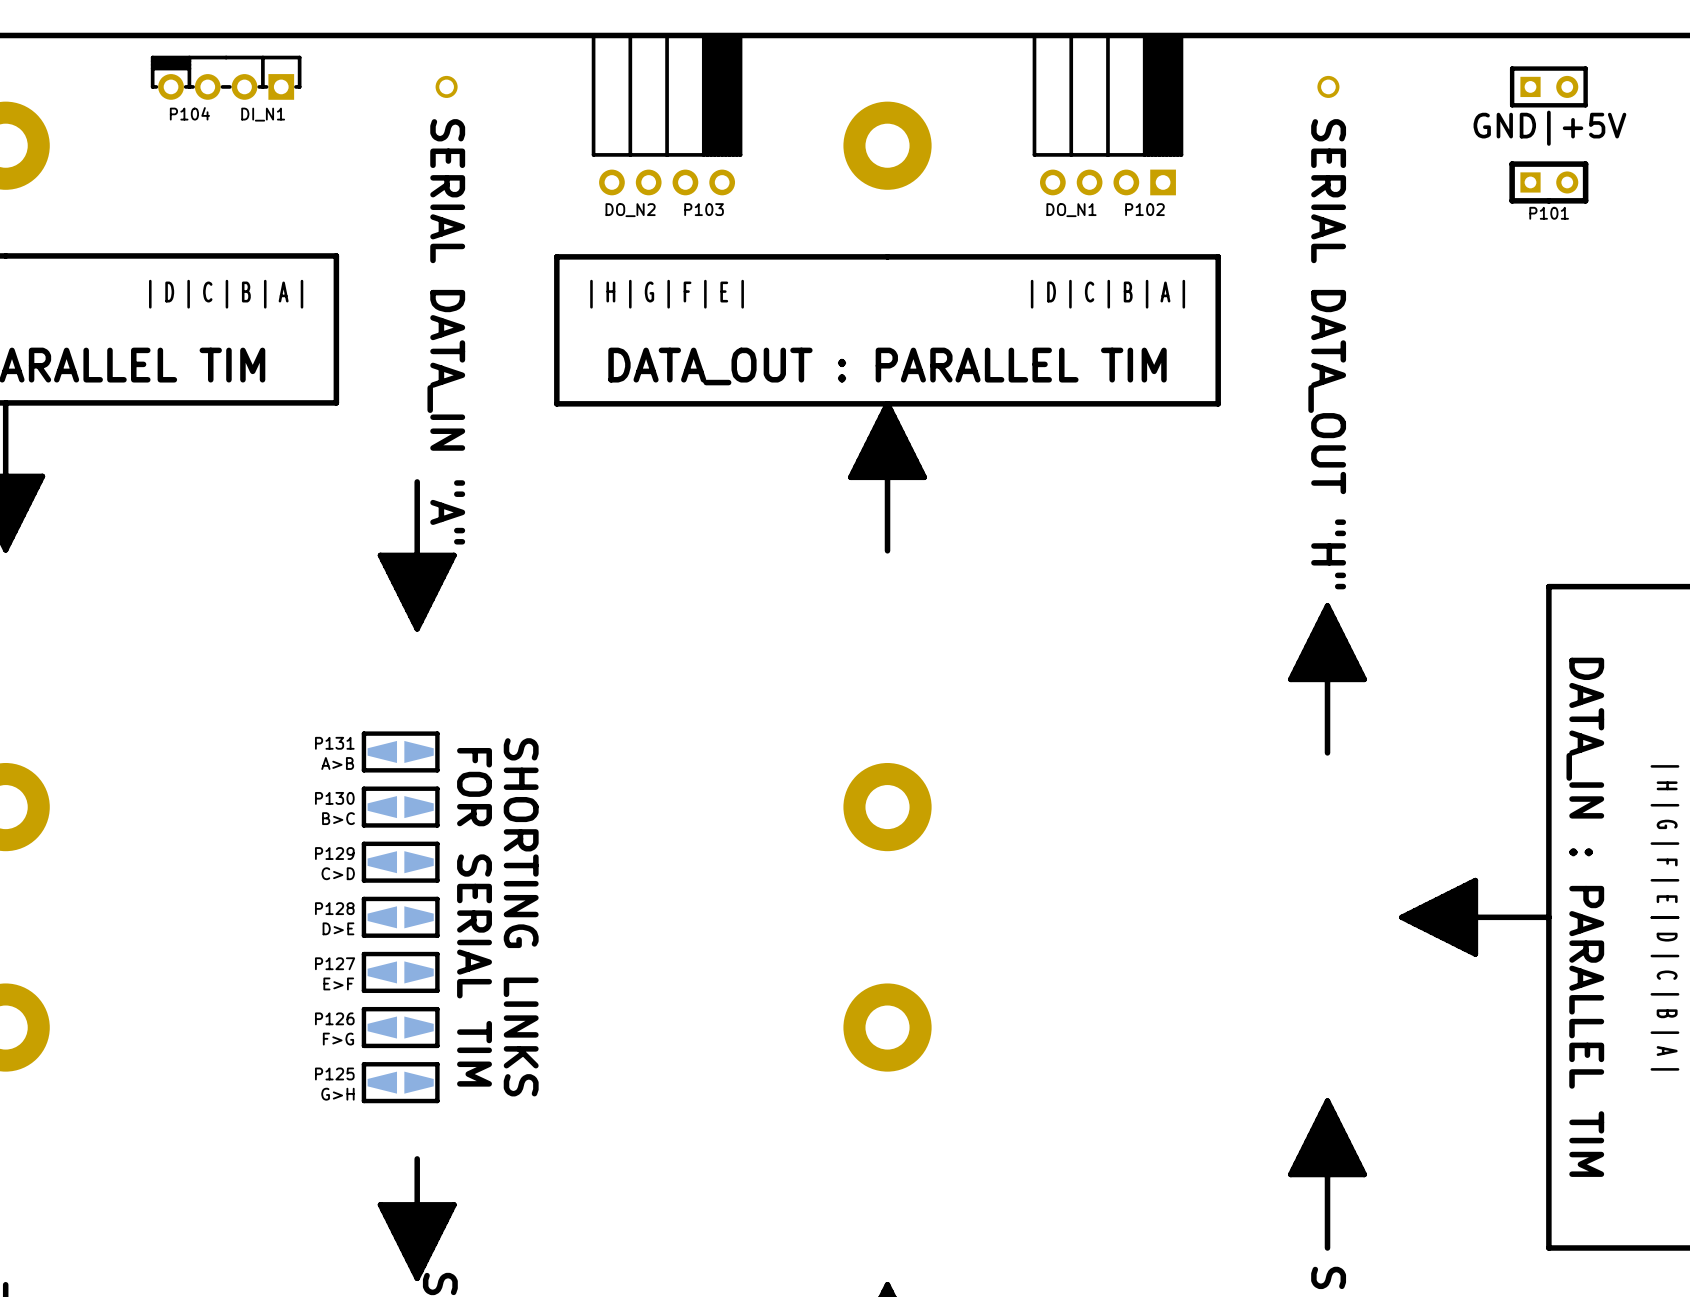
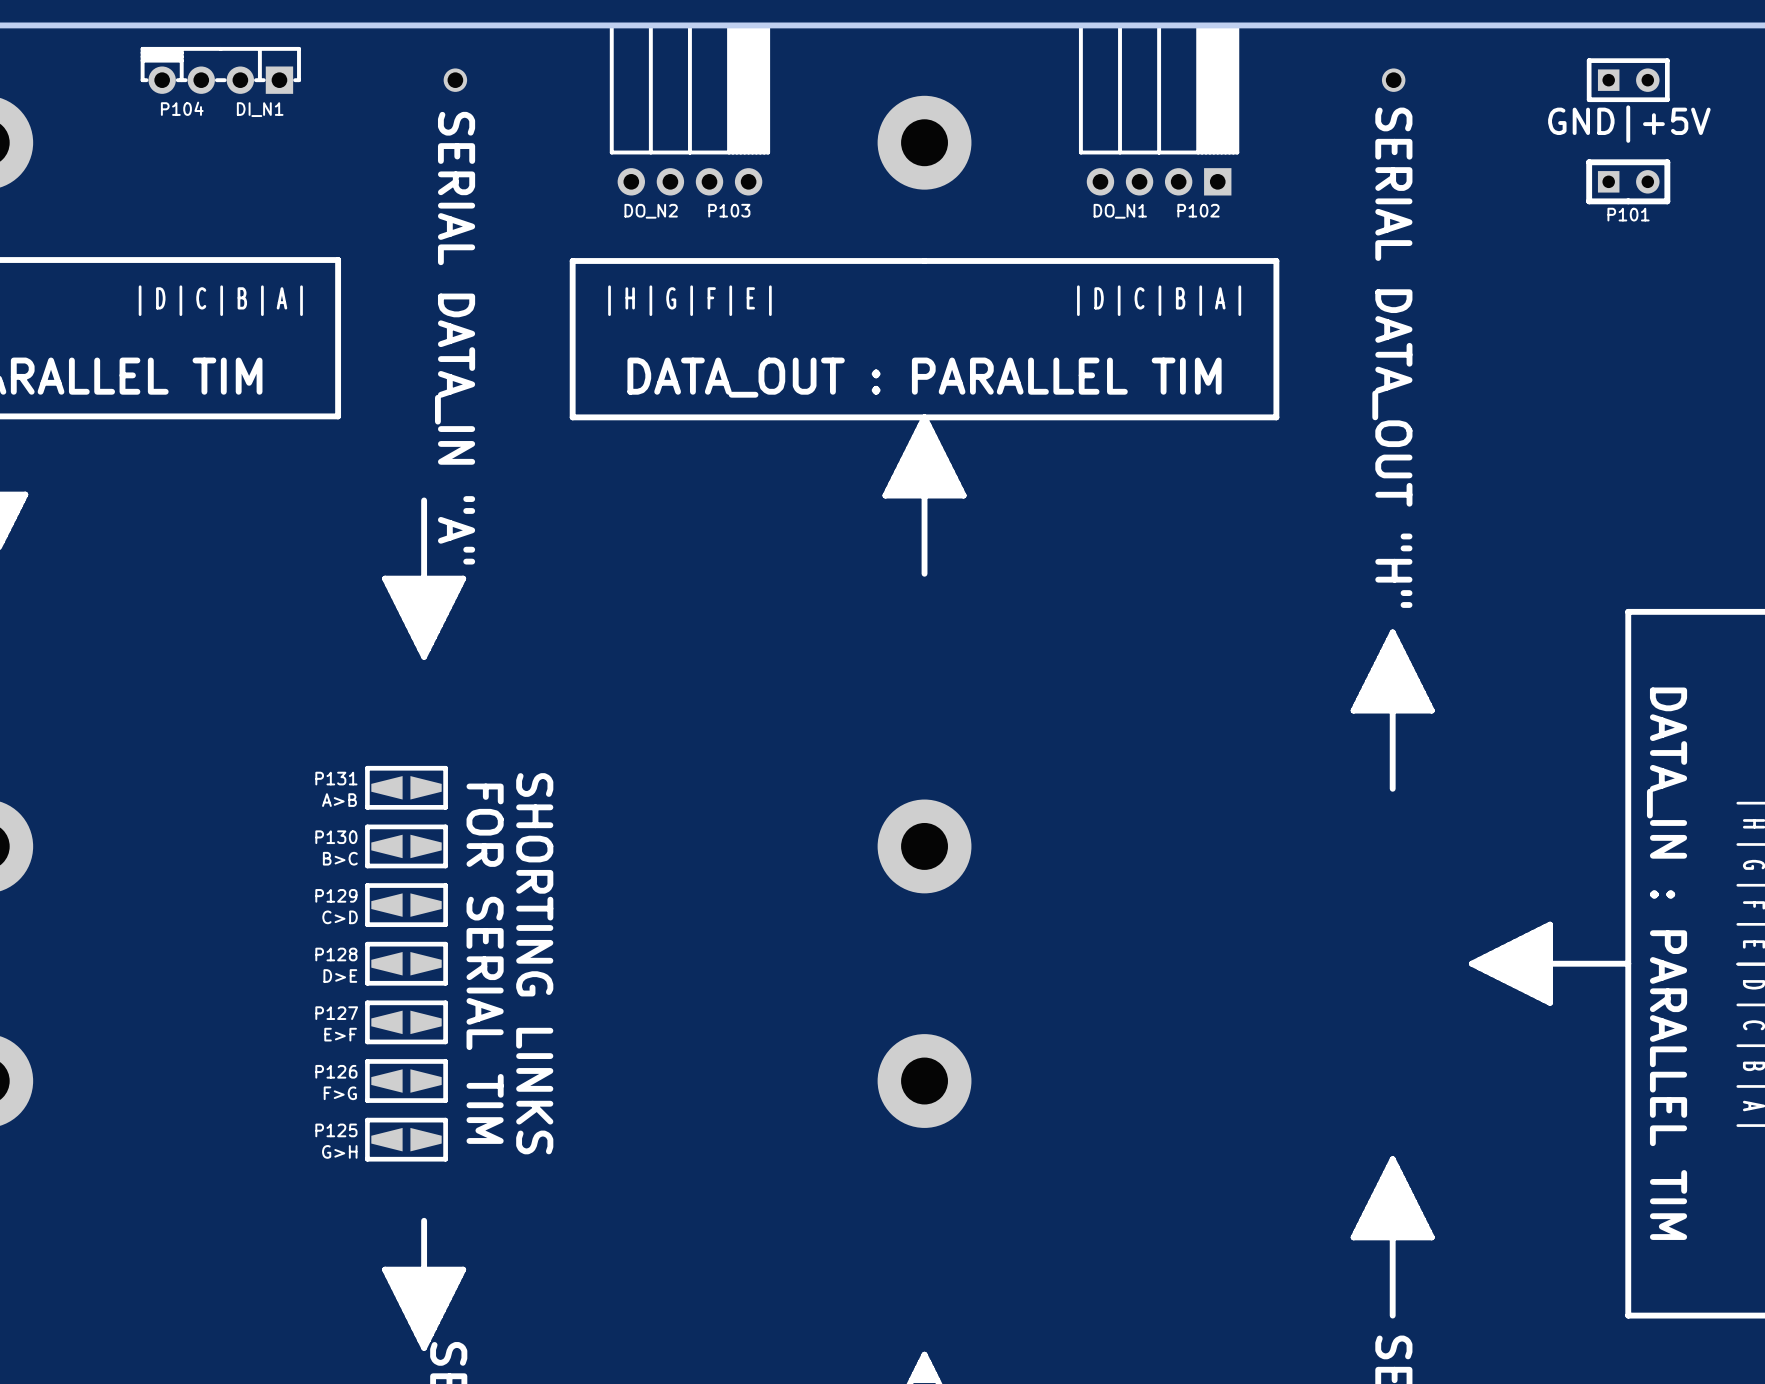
text position: SERIAL DATA_IN "A" (446, 331) -> SERIAL DATA_IN "A" (455, 338)
text position: SERIAL DATA_OUT "H" (1327, 354) -> SERIAL DATA_OUT "H" (1392, 357)

